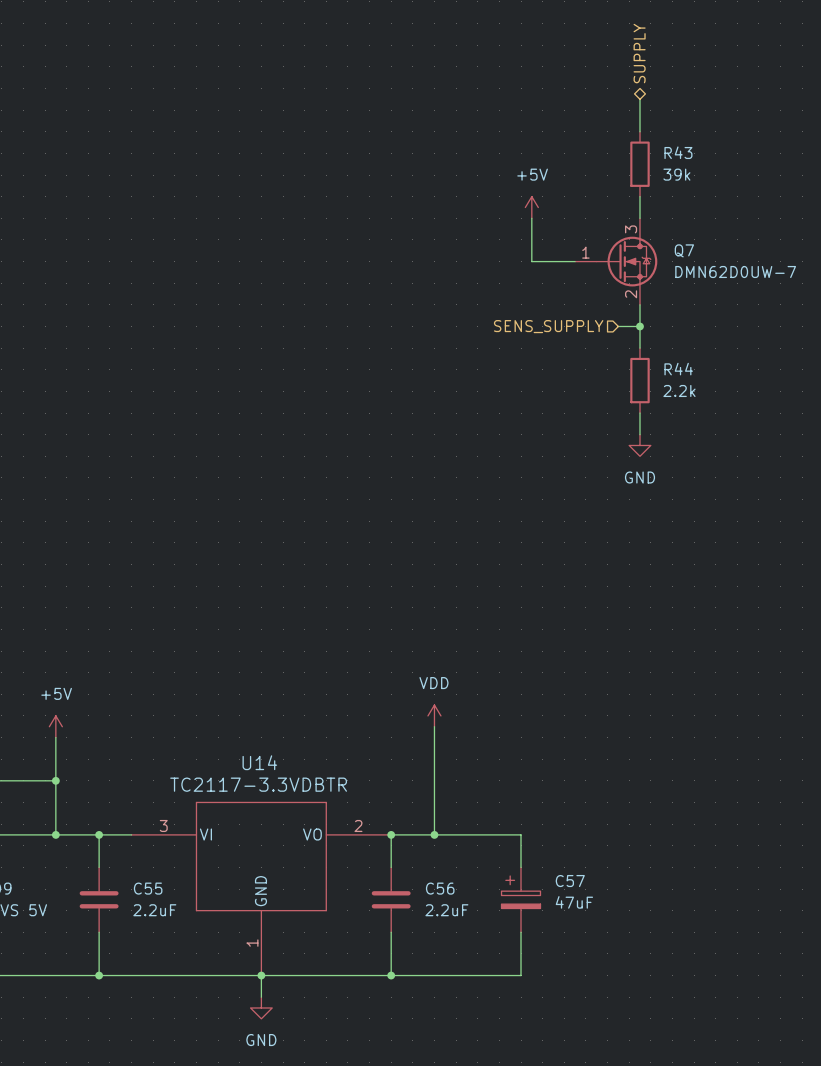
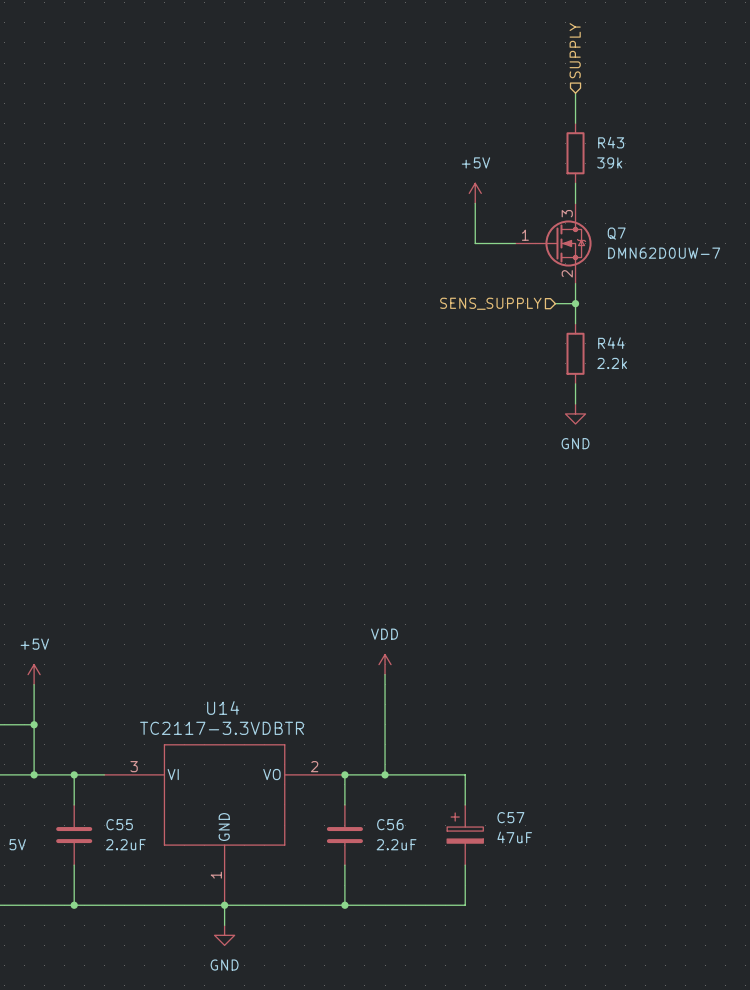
hierarchical label shape: bidirectional (639, 53) -> input (575, 50)

